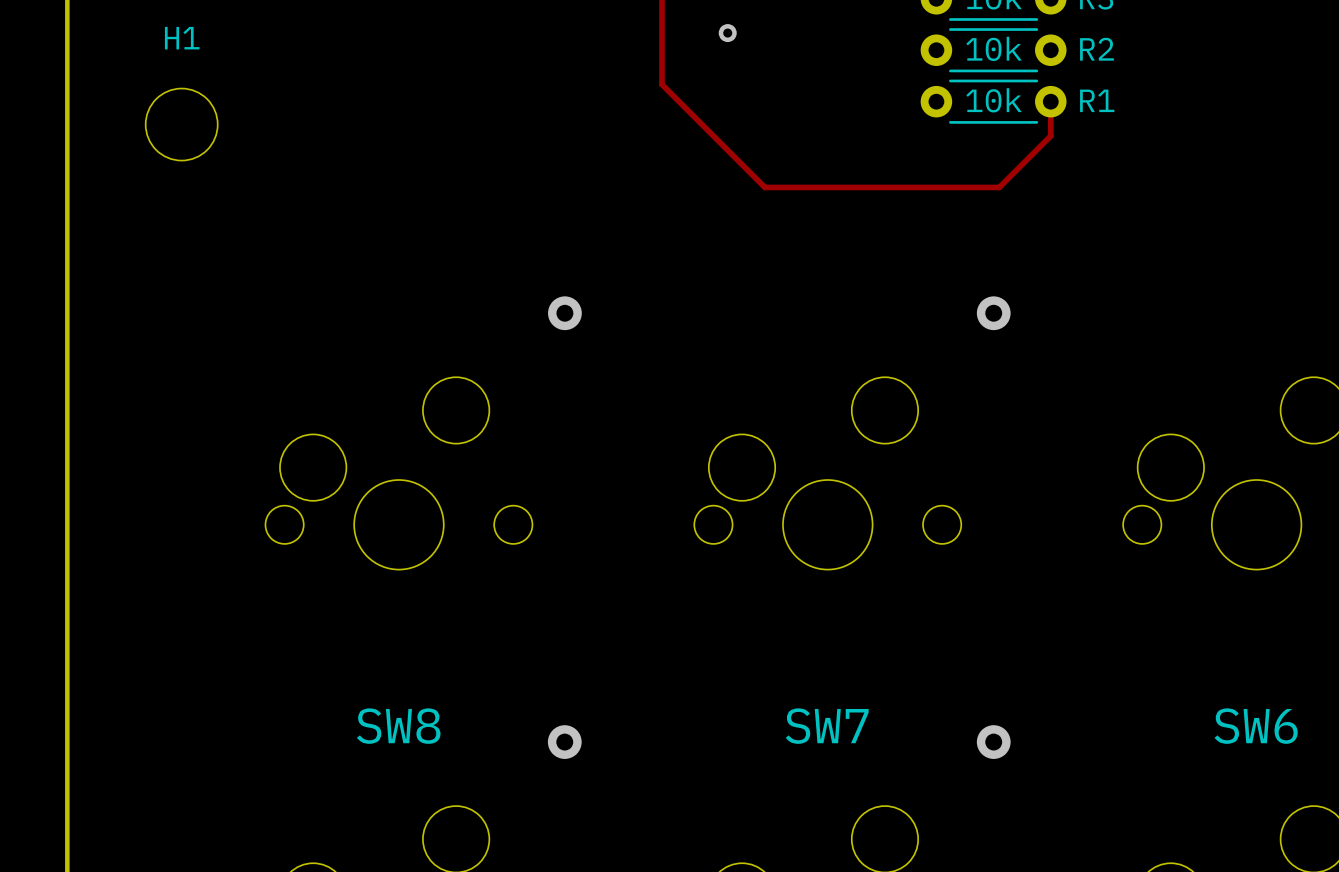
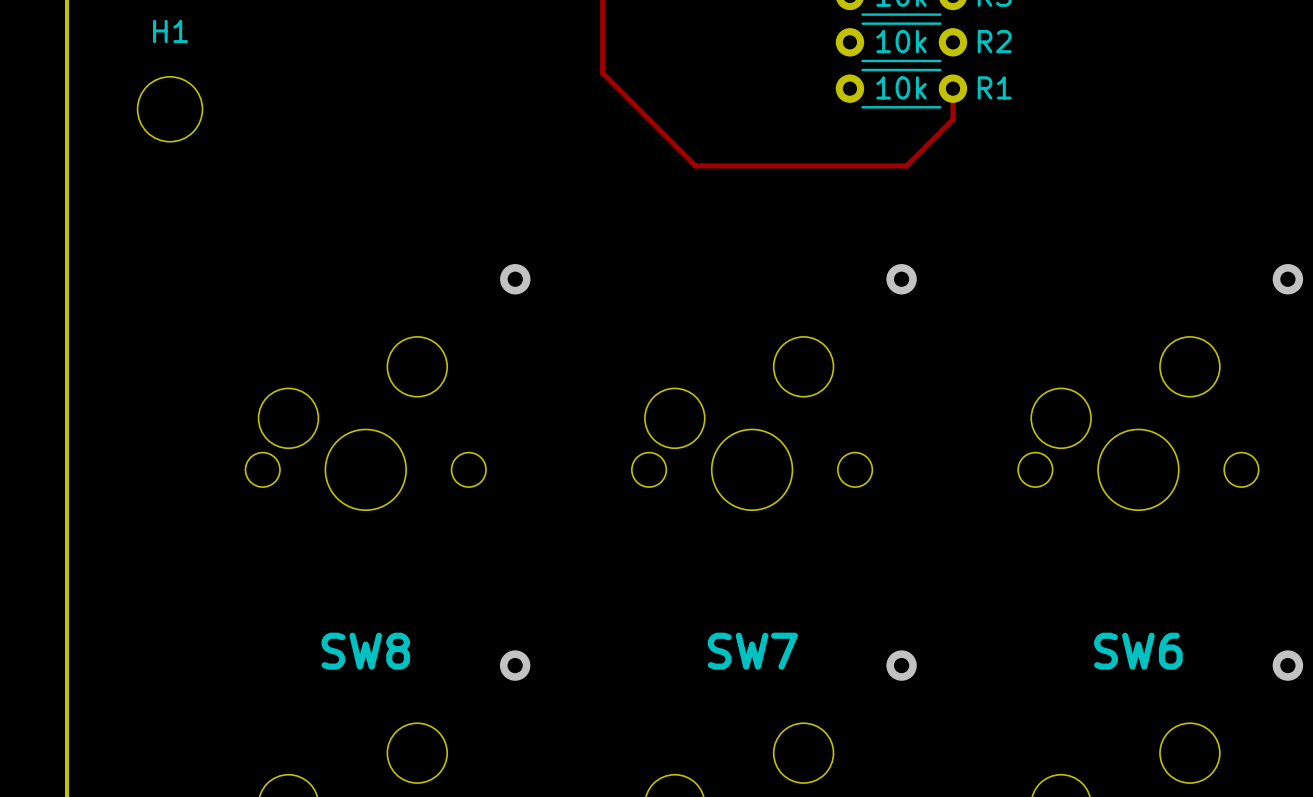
via: (727, 33) -> none

